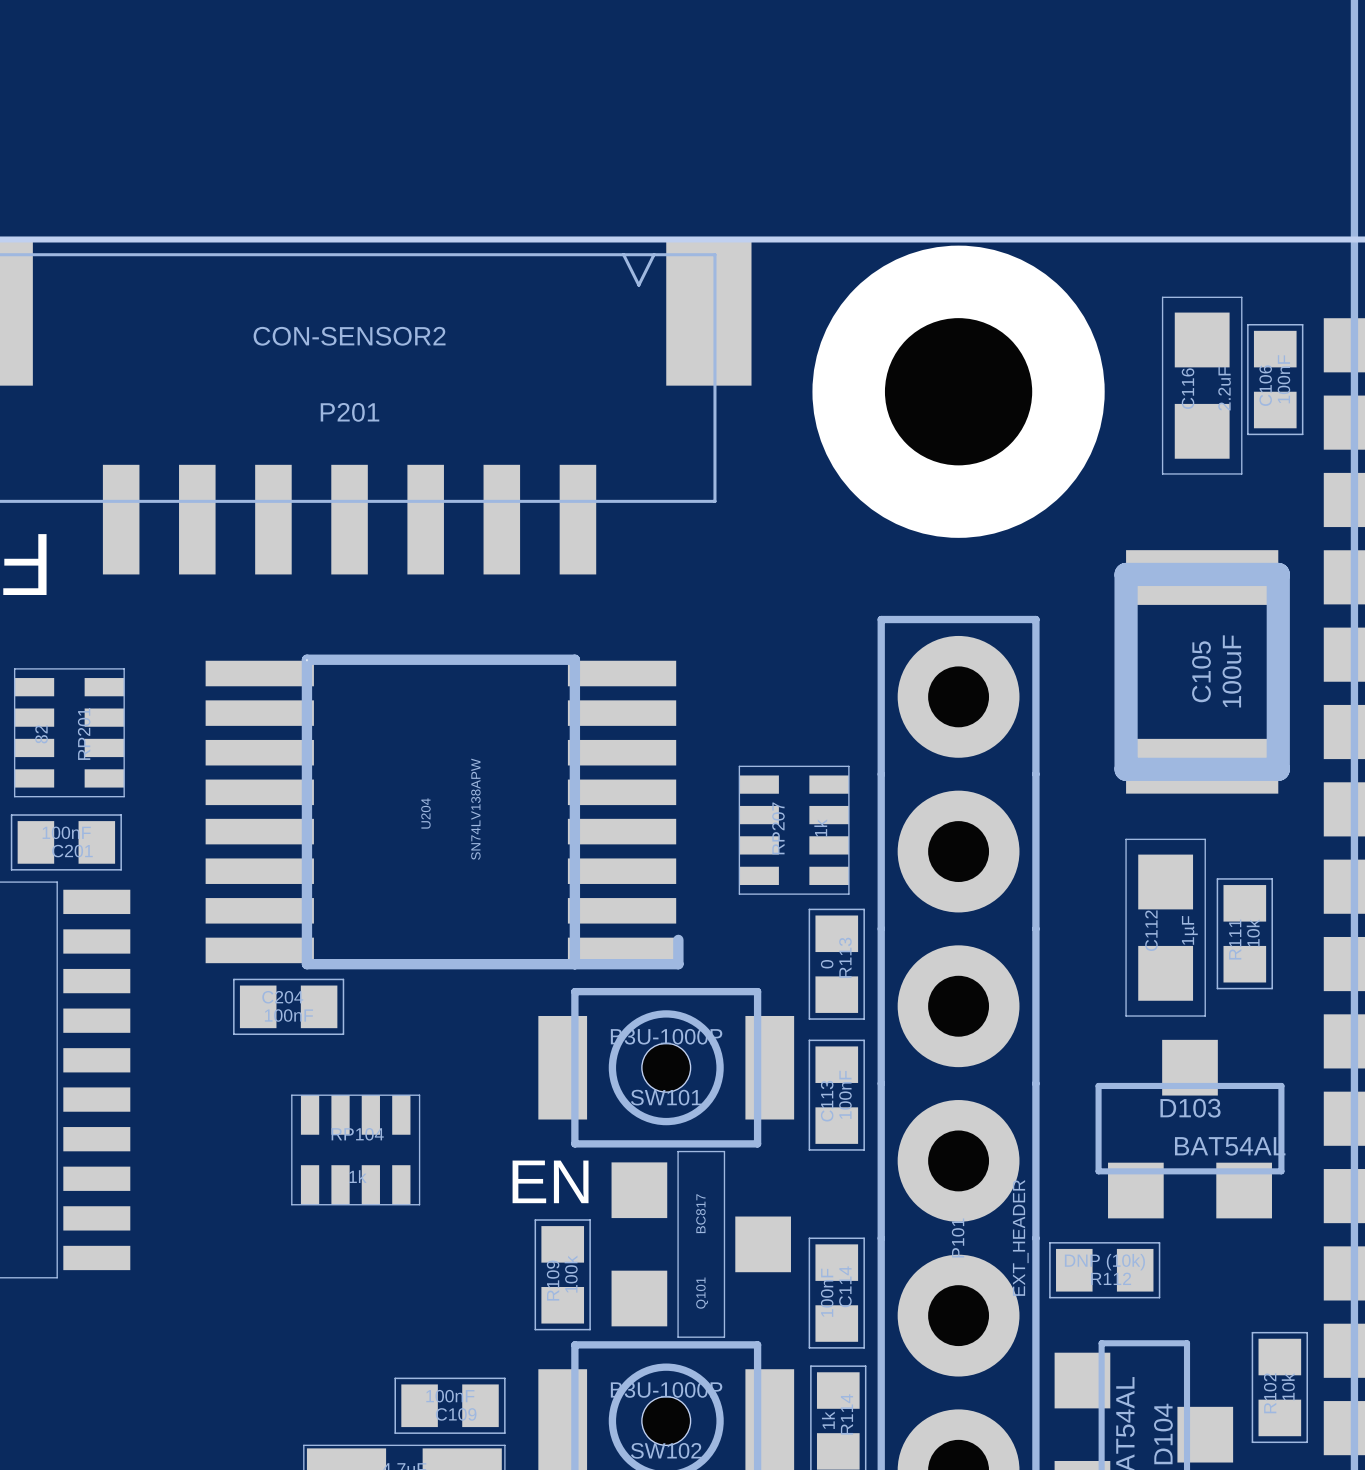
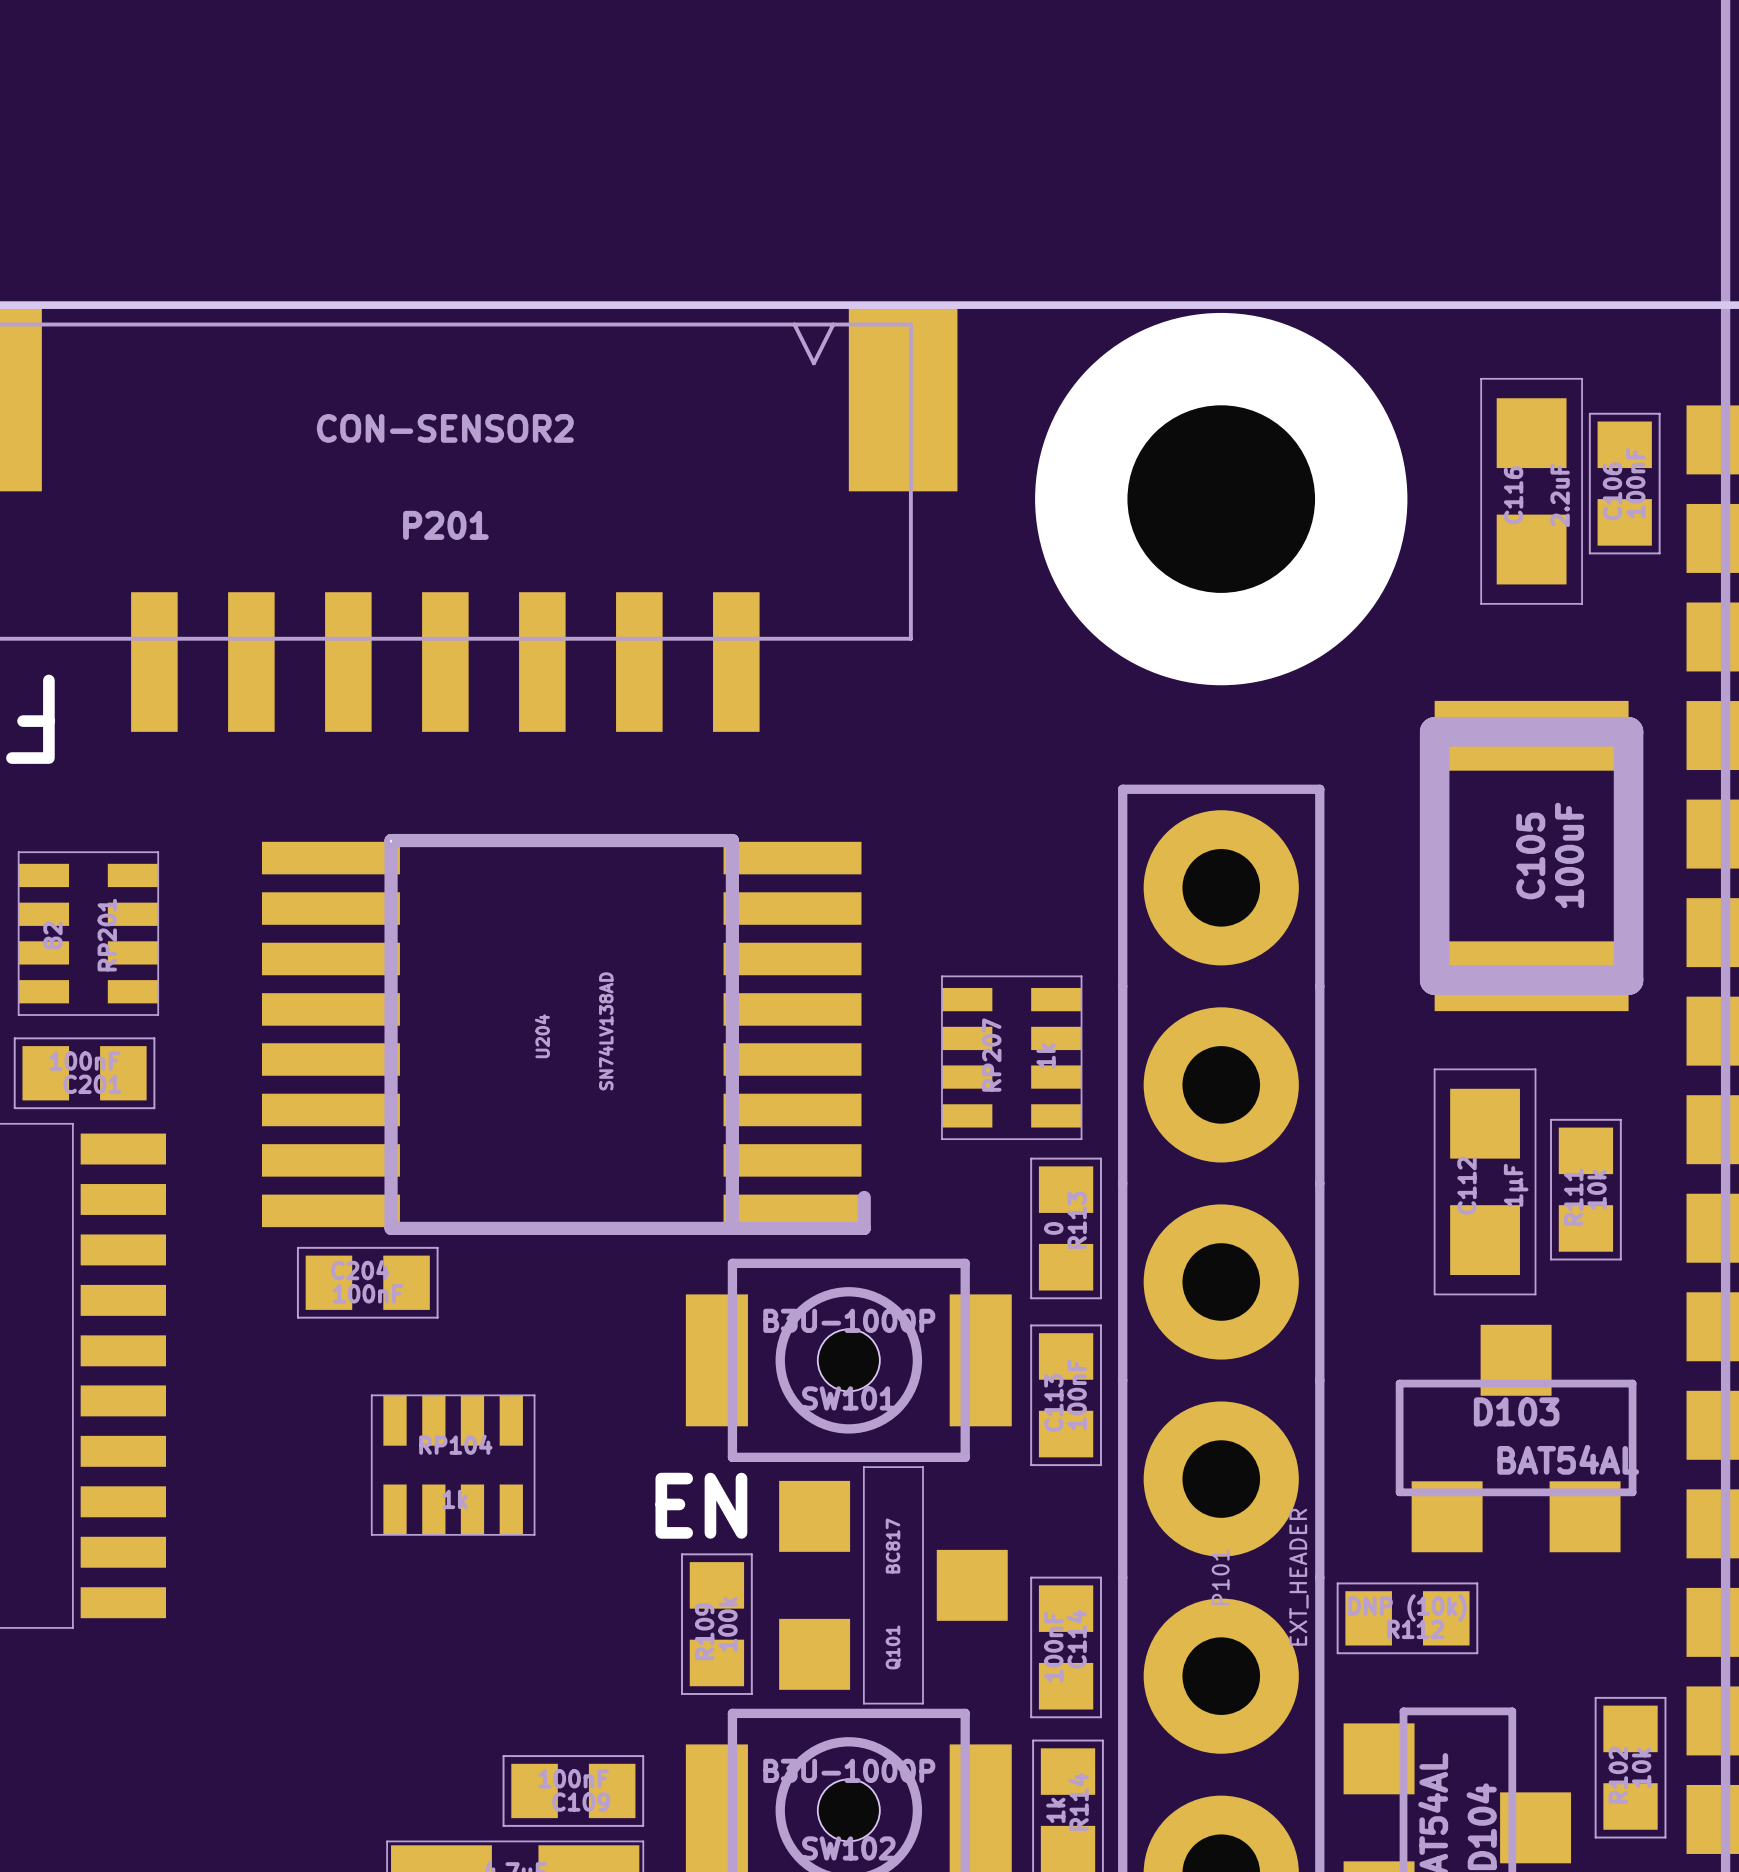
U204 value: SN74LV138APW (475, 809) -> SN74LV138AD (606, 1031)

